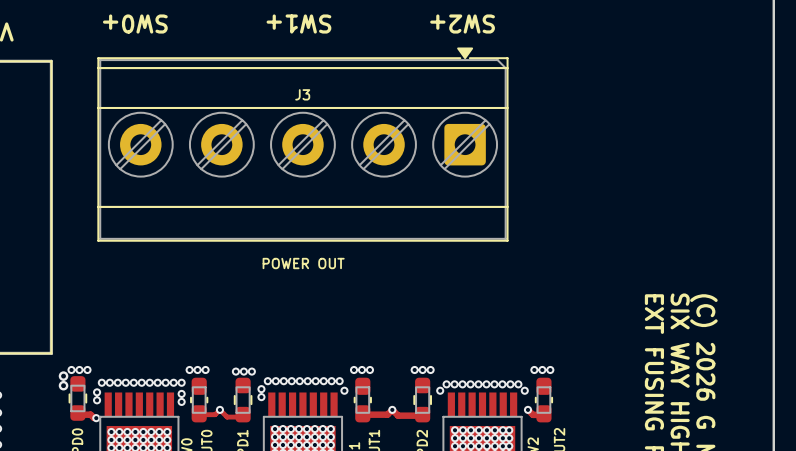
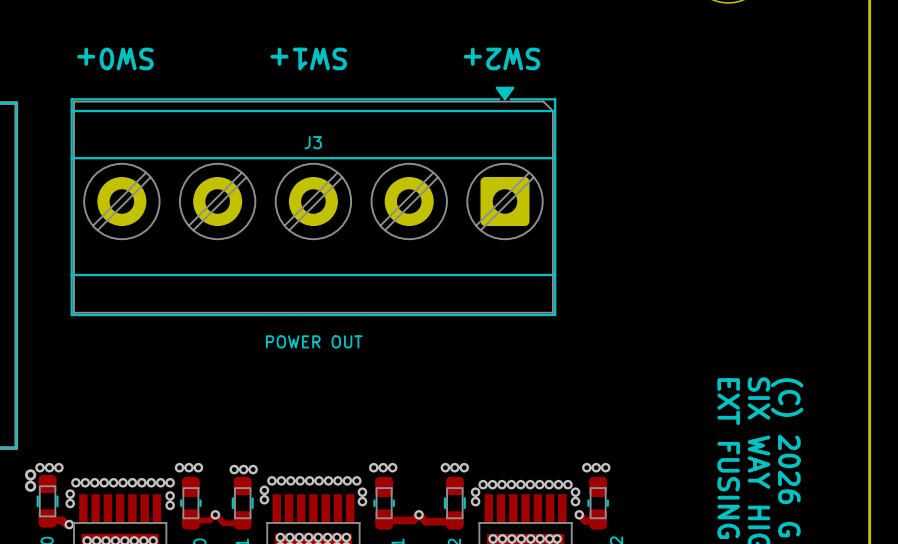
via: none -> (362, 501)
via: none -> (475, 501)
via: none -> (575, 501)

